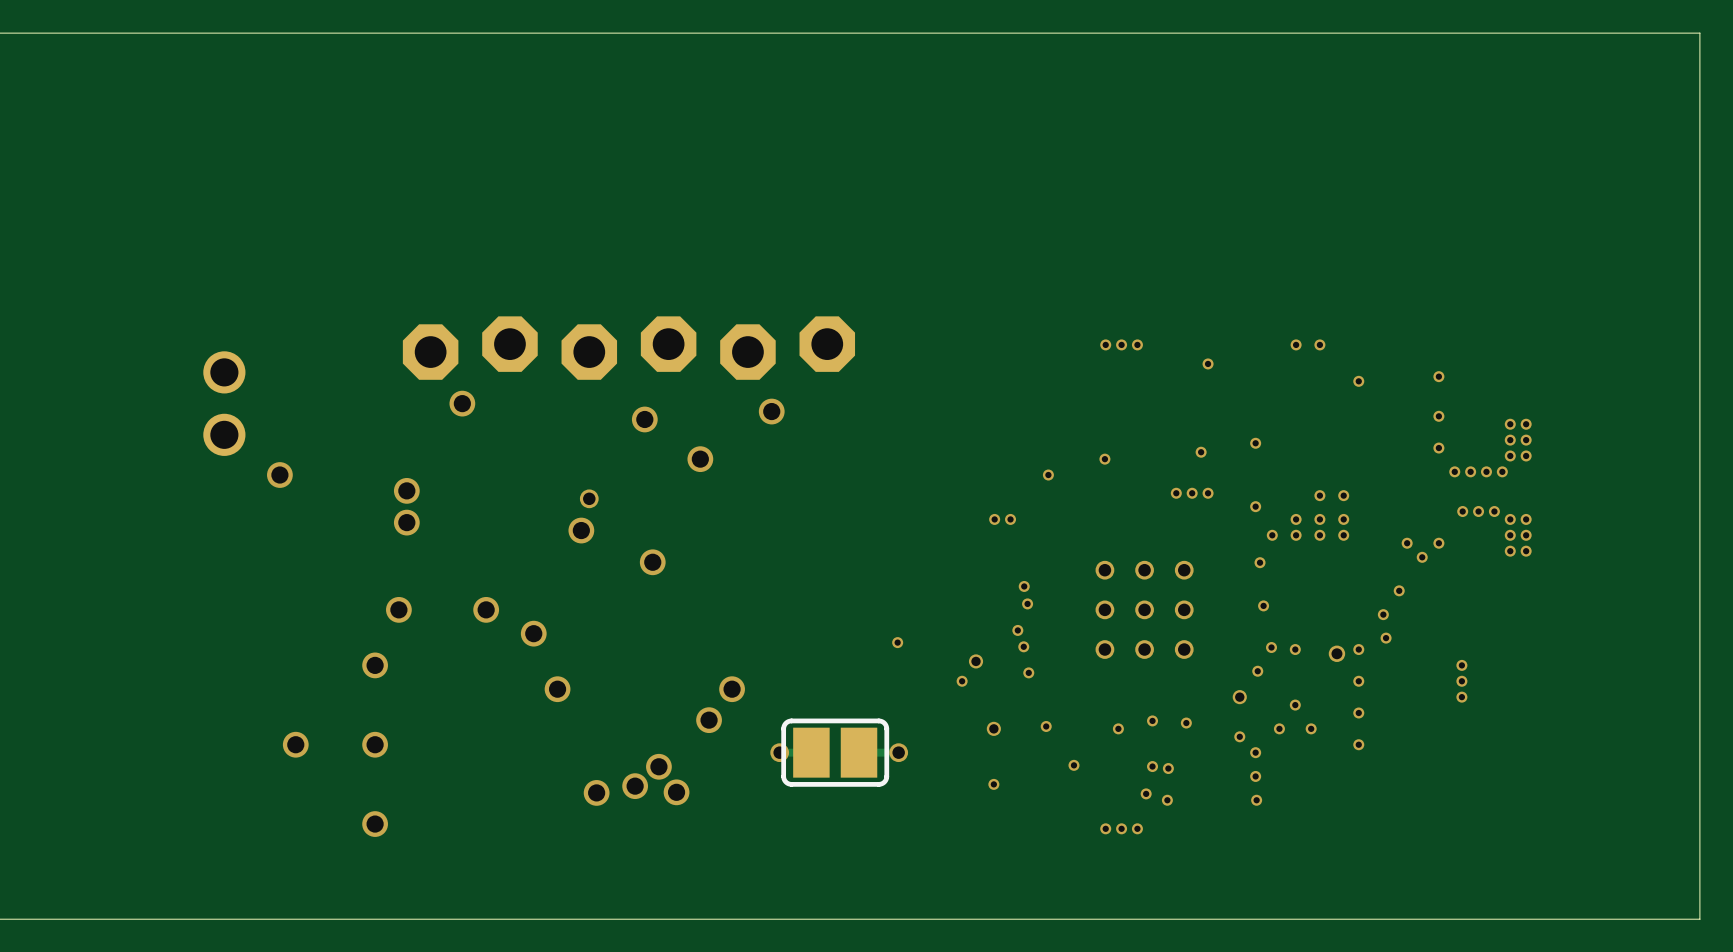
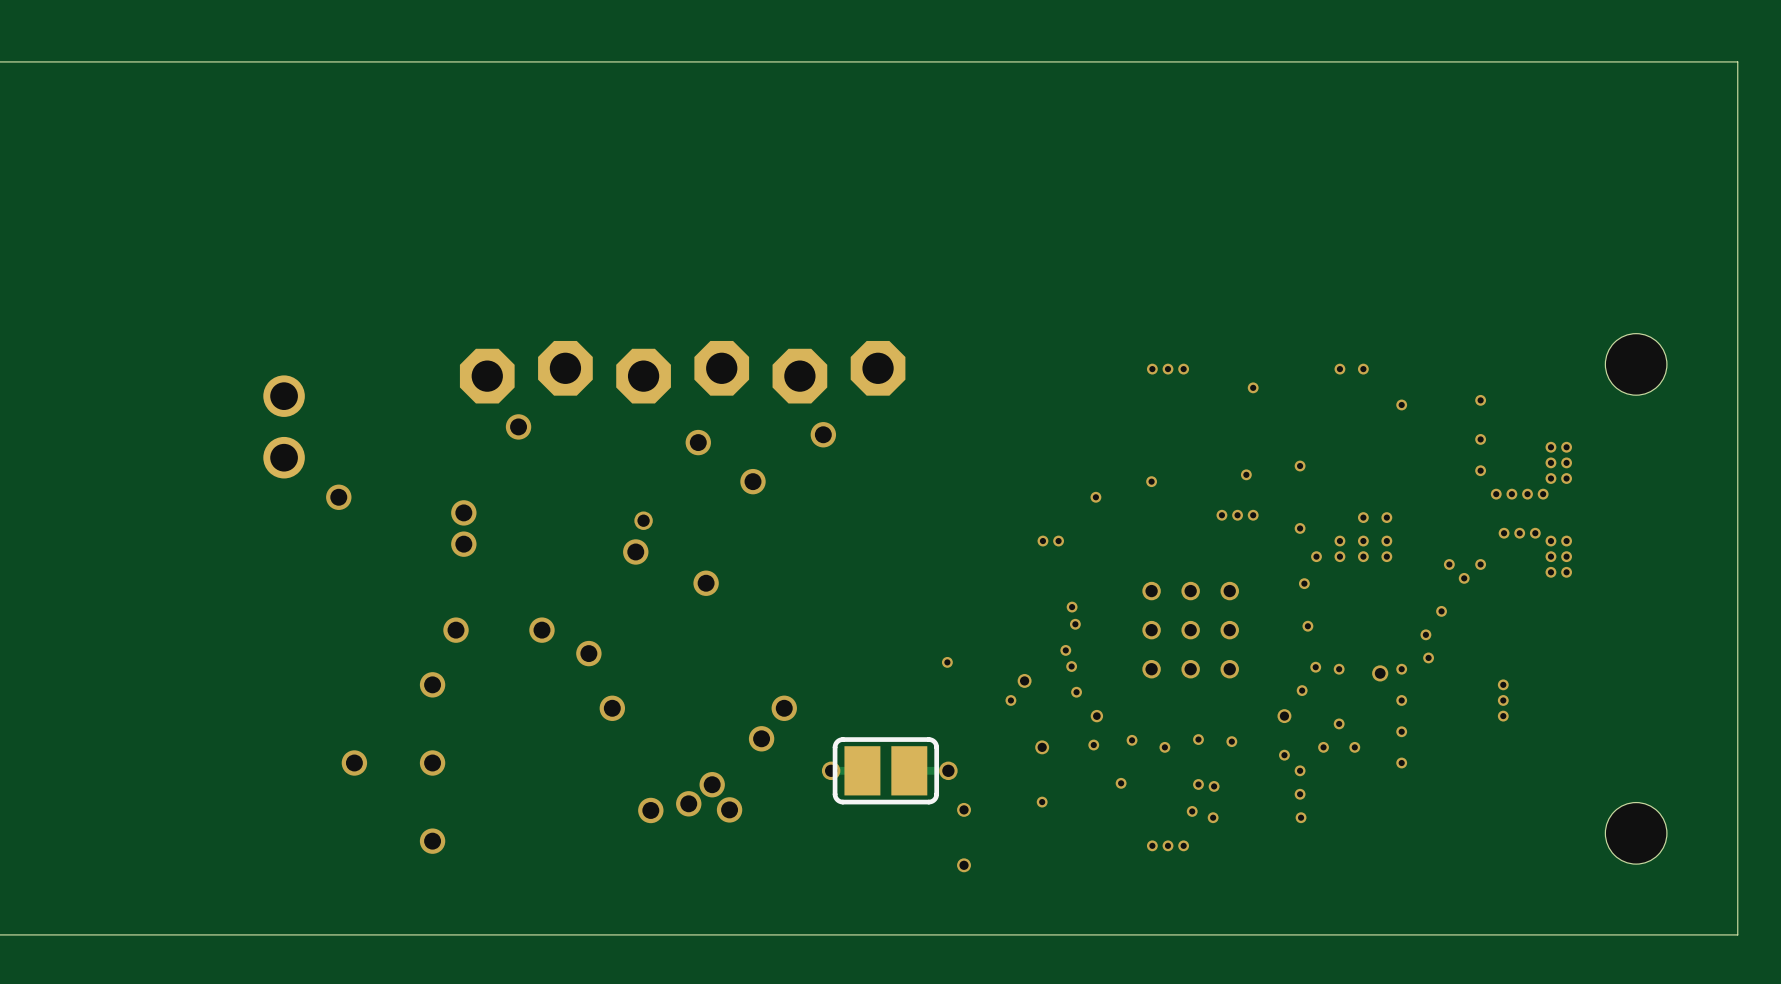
hole: none -> (1636, 364)
via: none -> (1096, 716)
via: none -> (1132, 740)
via: none -> (964, 809)
hole: none -> (1636, 833)
via: none -> (964, 865)

